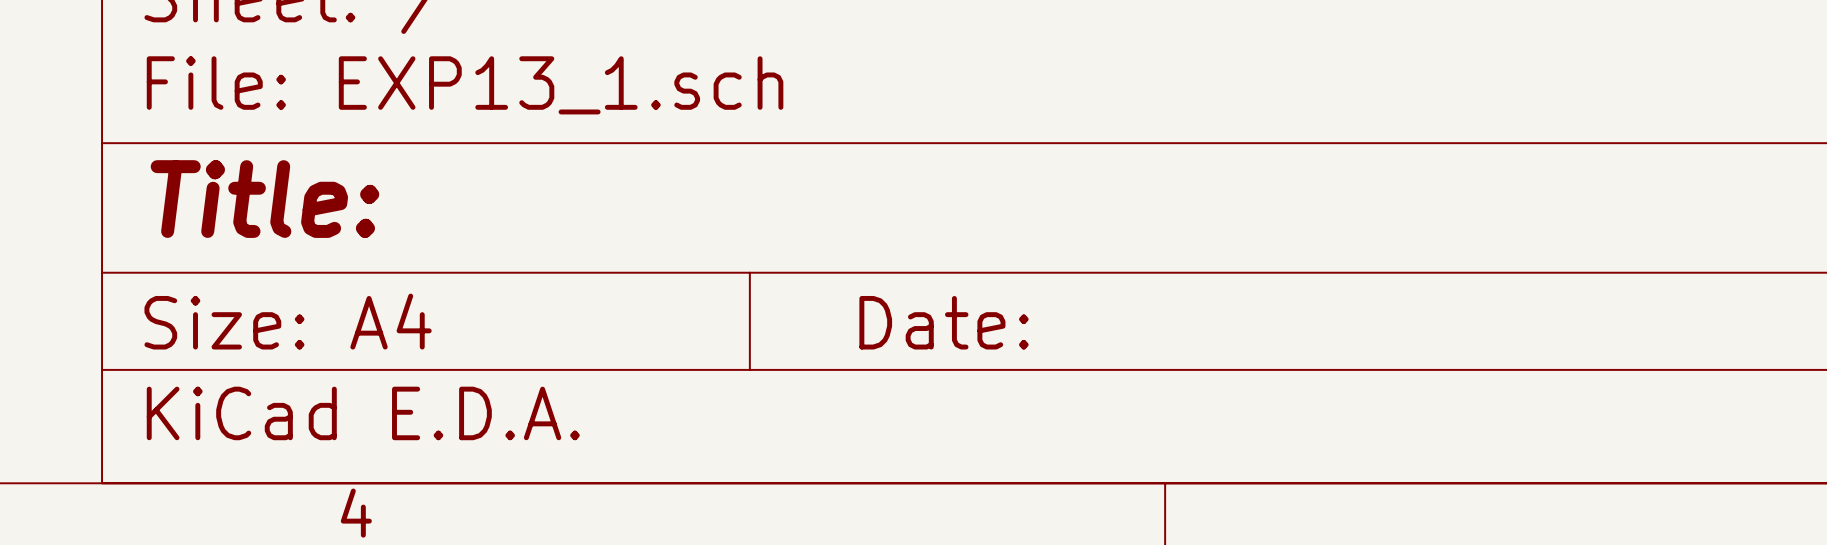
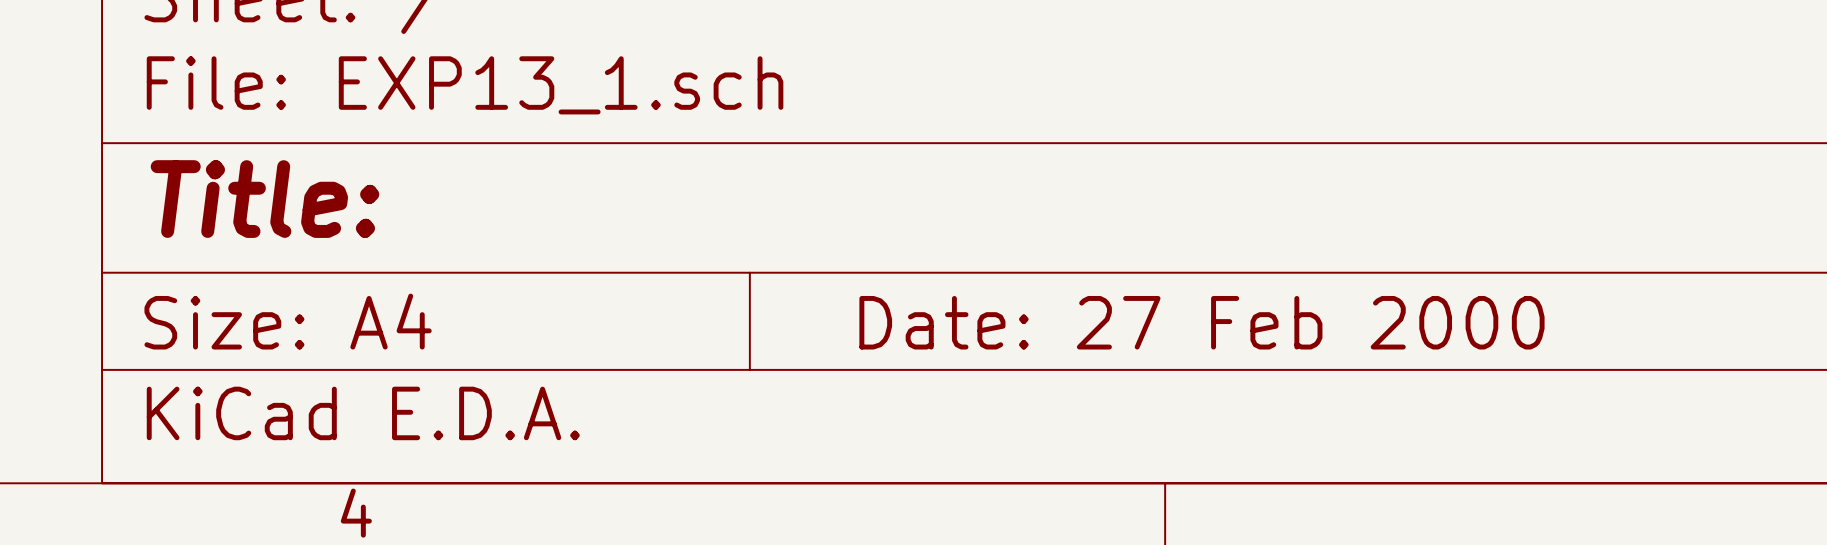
title block: Date: (944, 322) -> Date: 27 Feb 2000 (1201, 322)

